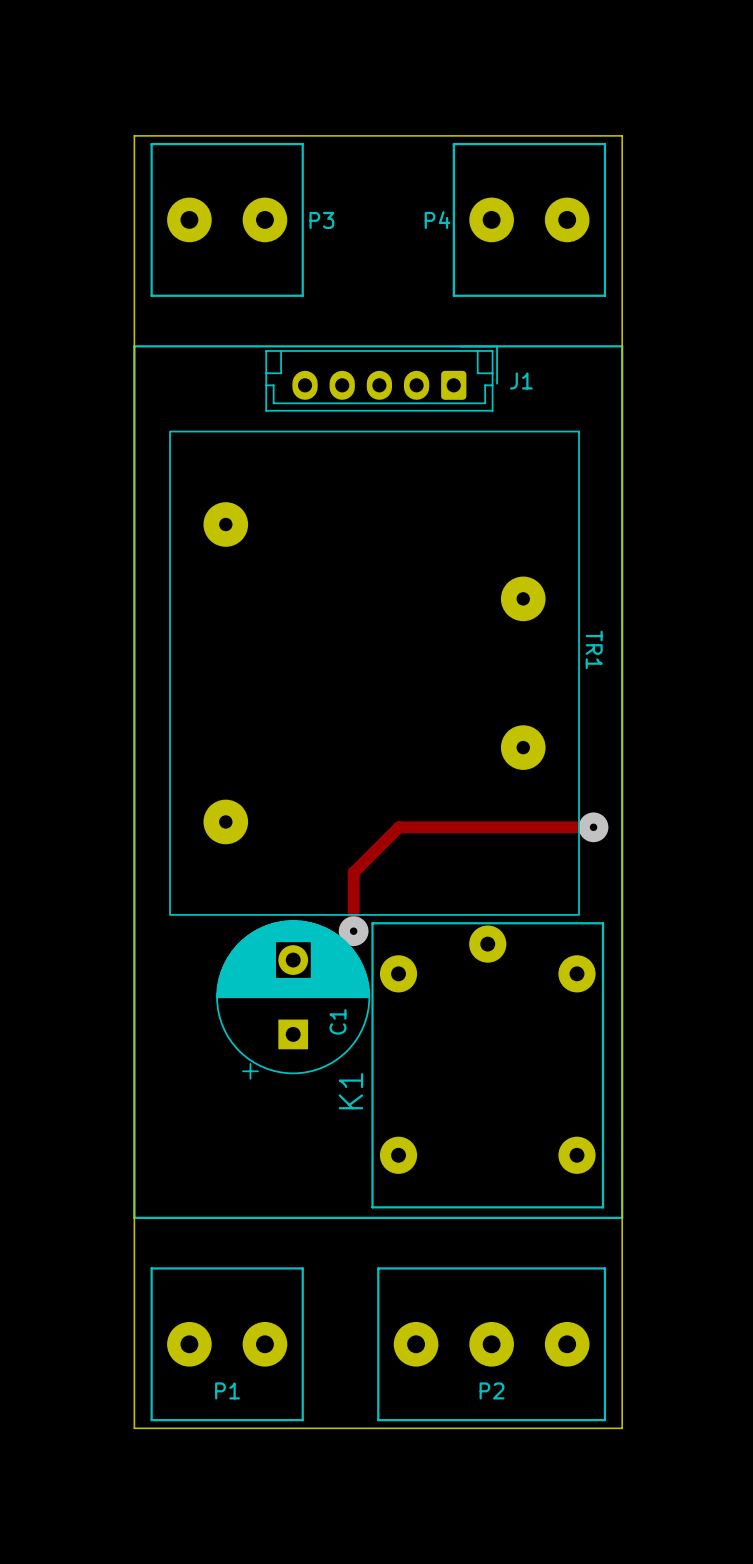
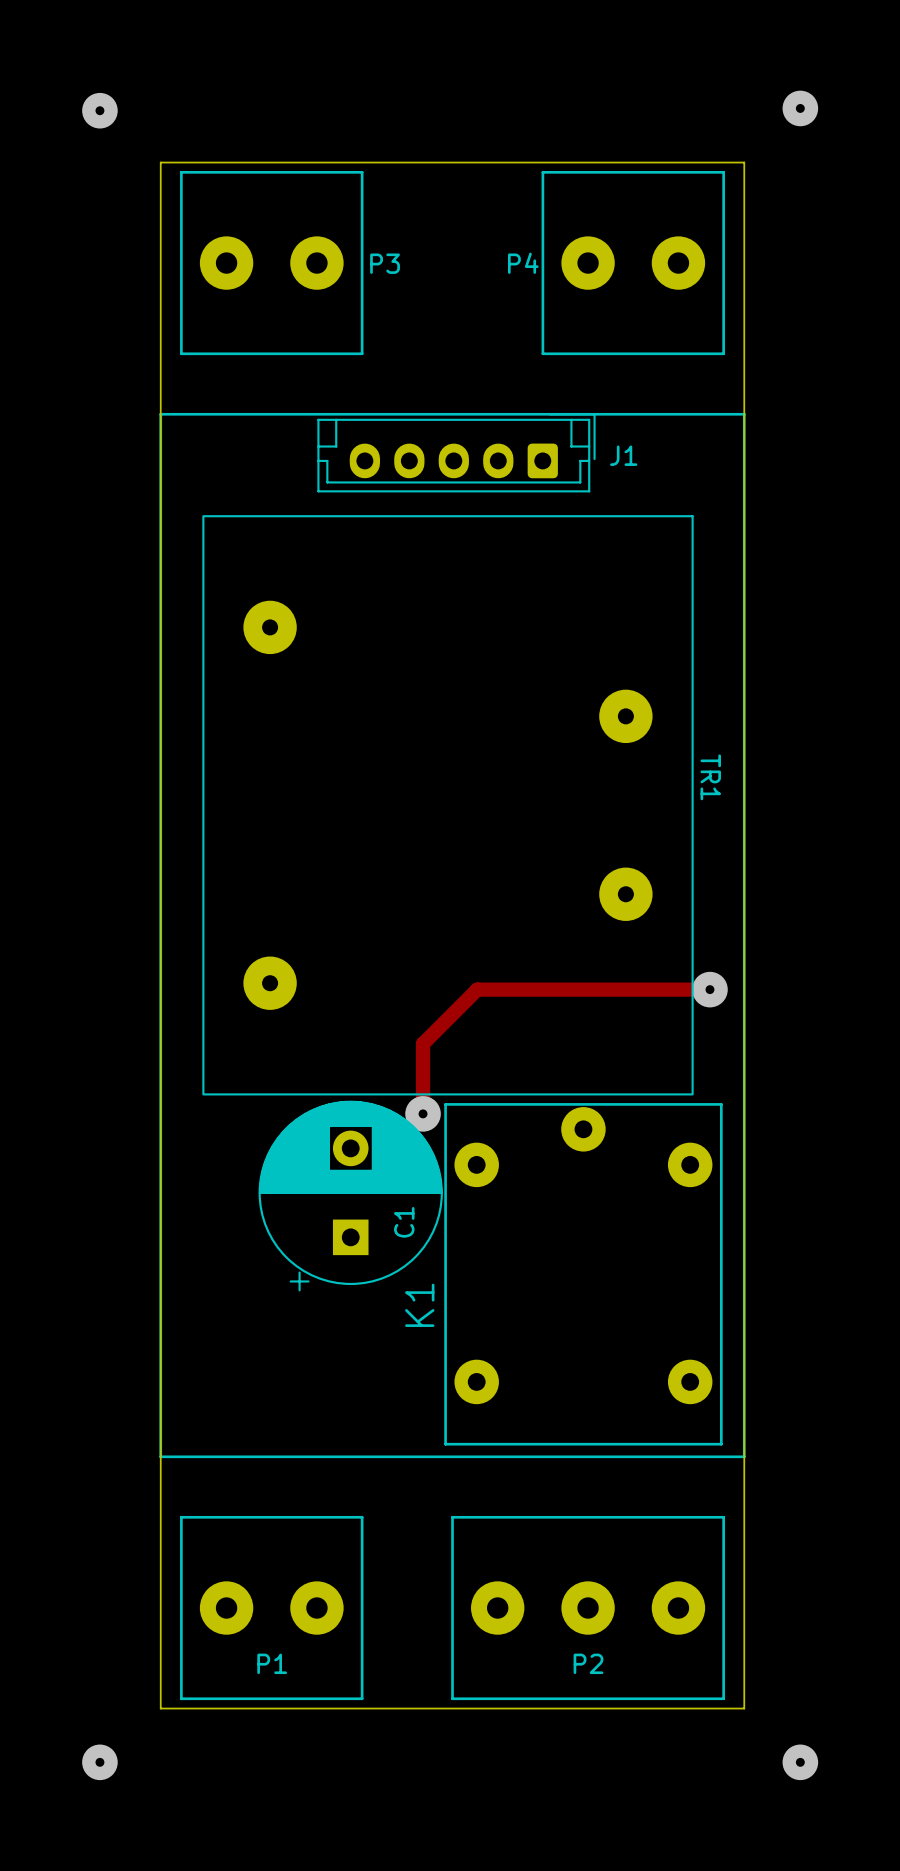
via: none -> (800, 108)
via: none -> (99, 110)
via: none -> (99, 1762)
via: none -> (800, 1762)

